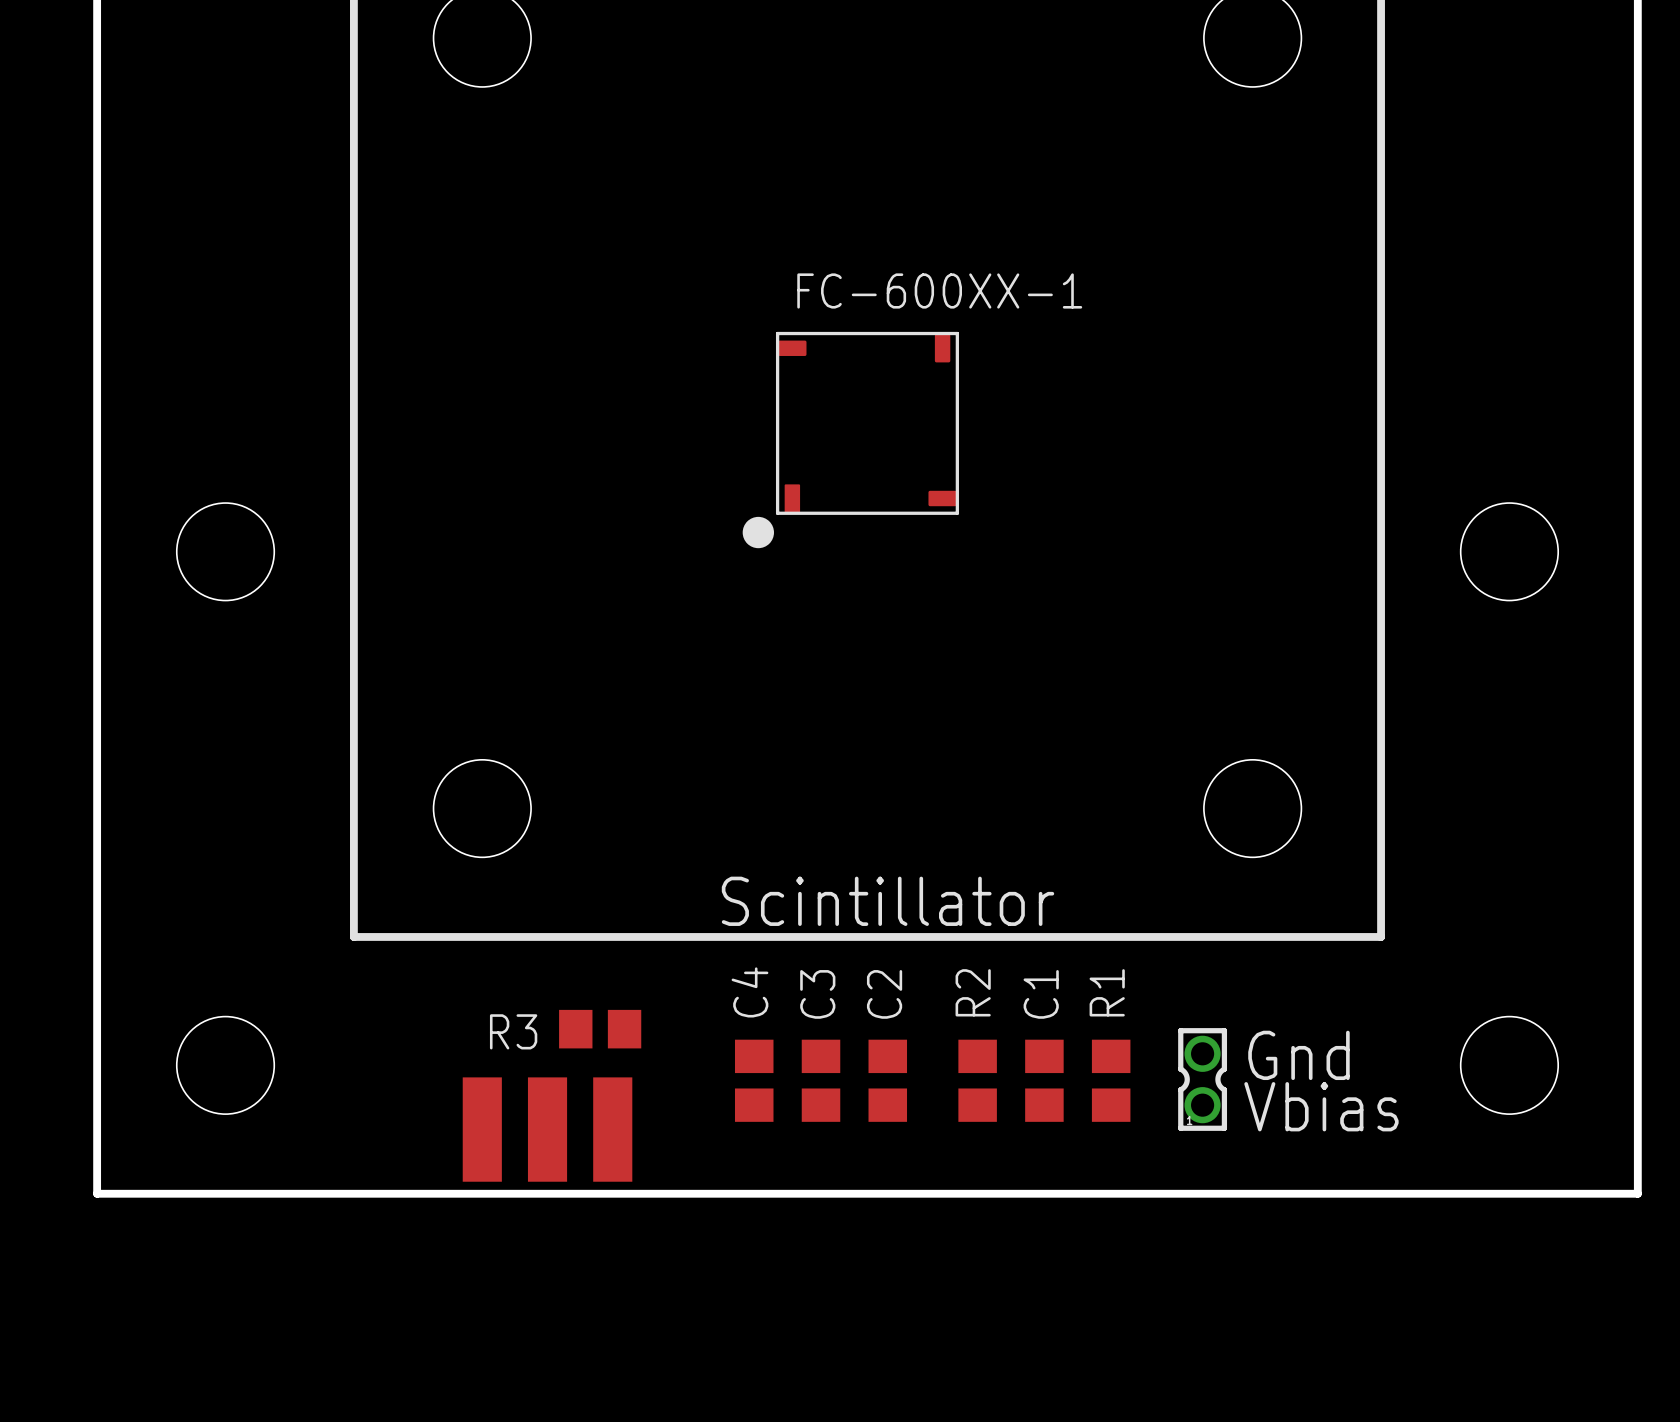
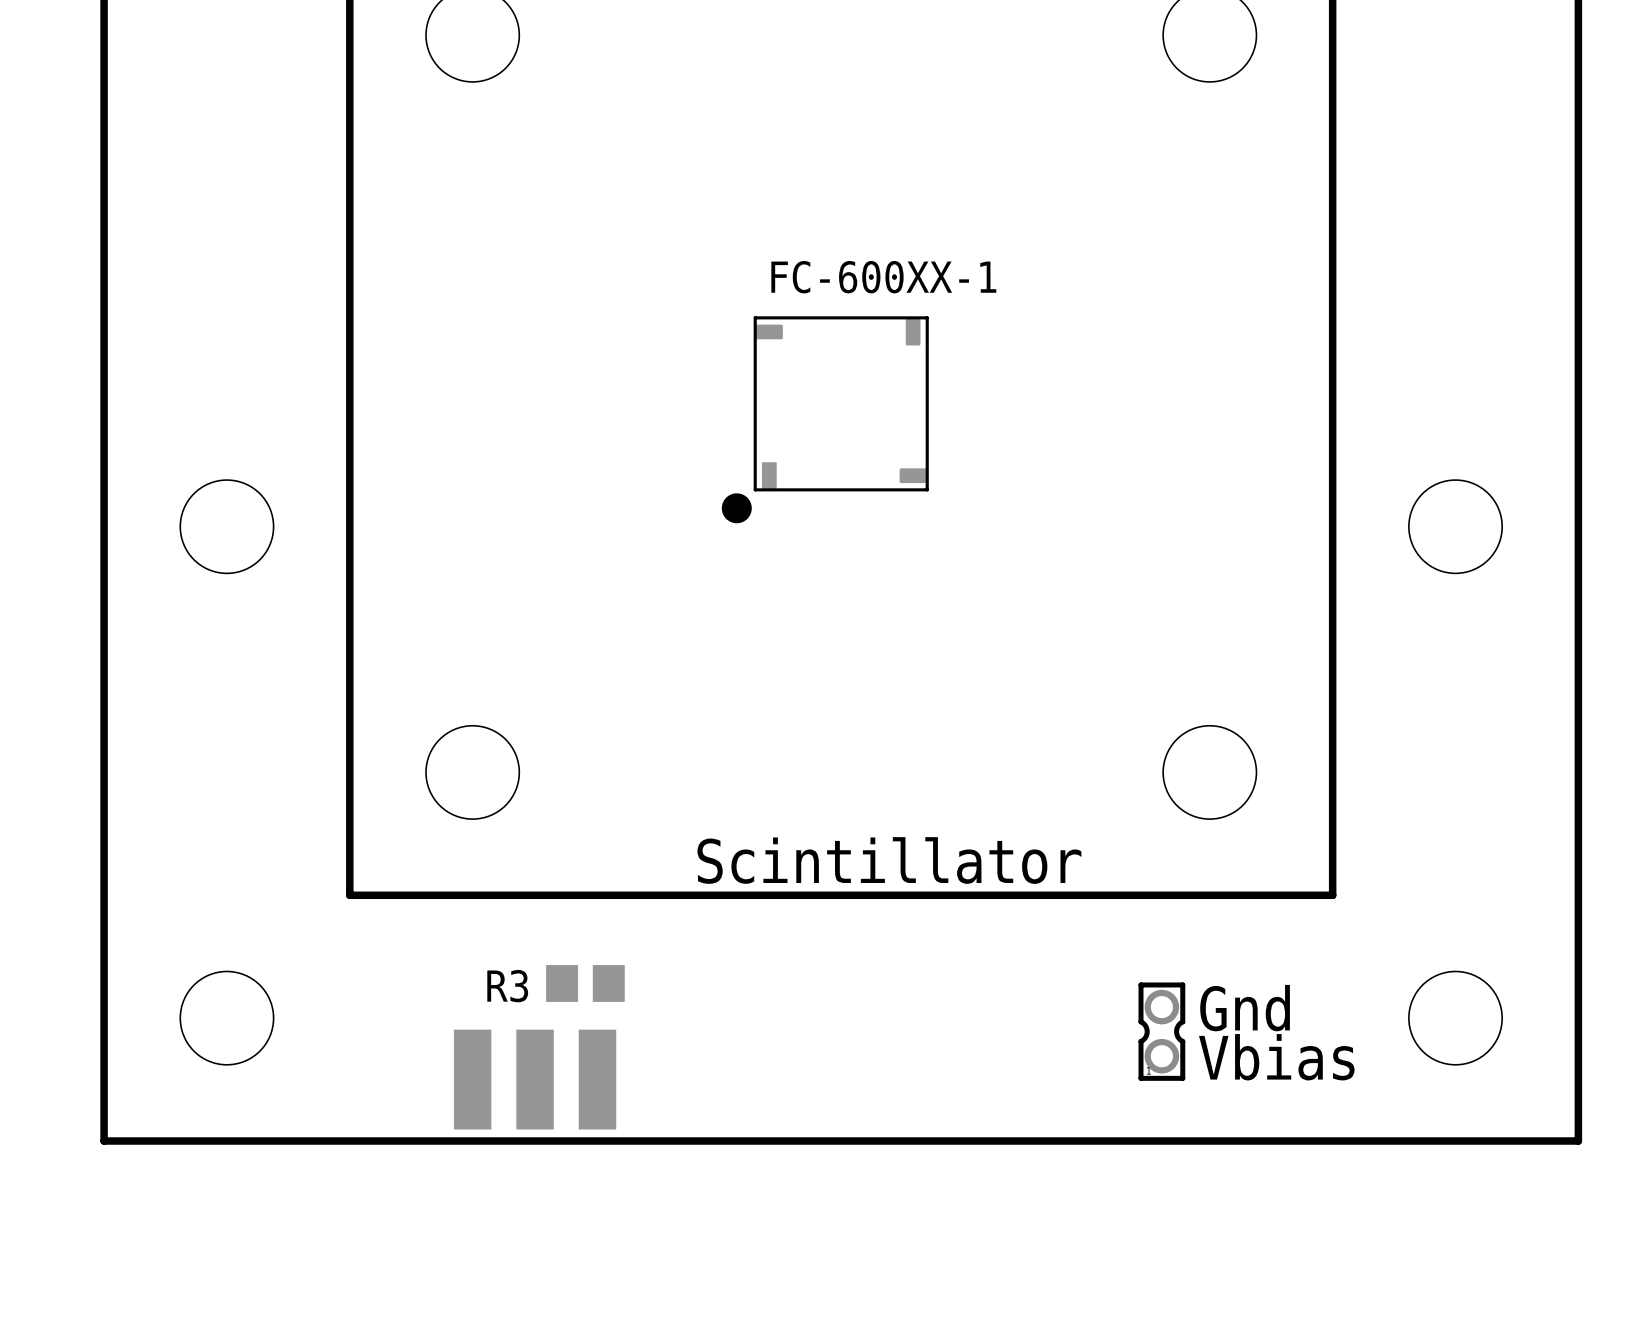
C4: (754, 1080) -> none
C3: (821, 1080) -> none
C2: (887, 1080) -> none
R2: (977, 1080) -> none
C1: (1044, 1080) -> none
R1: (1111, 1080) -> none

